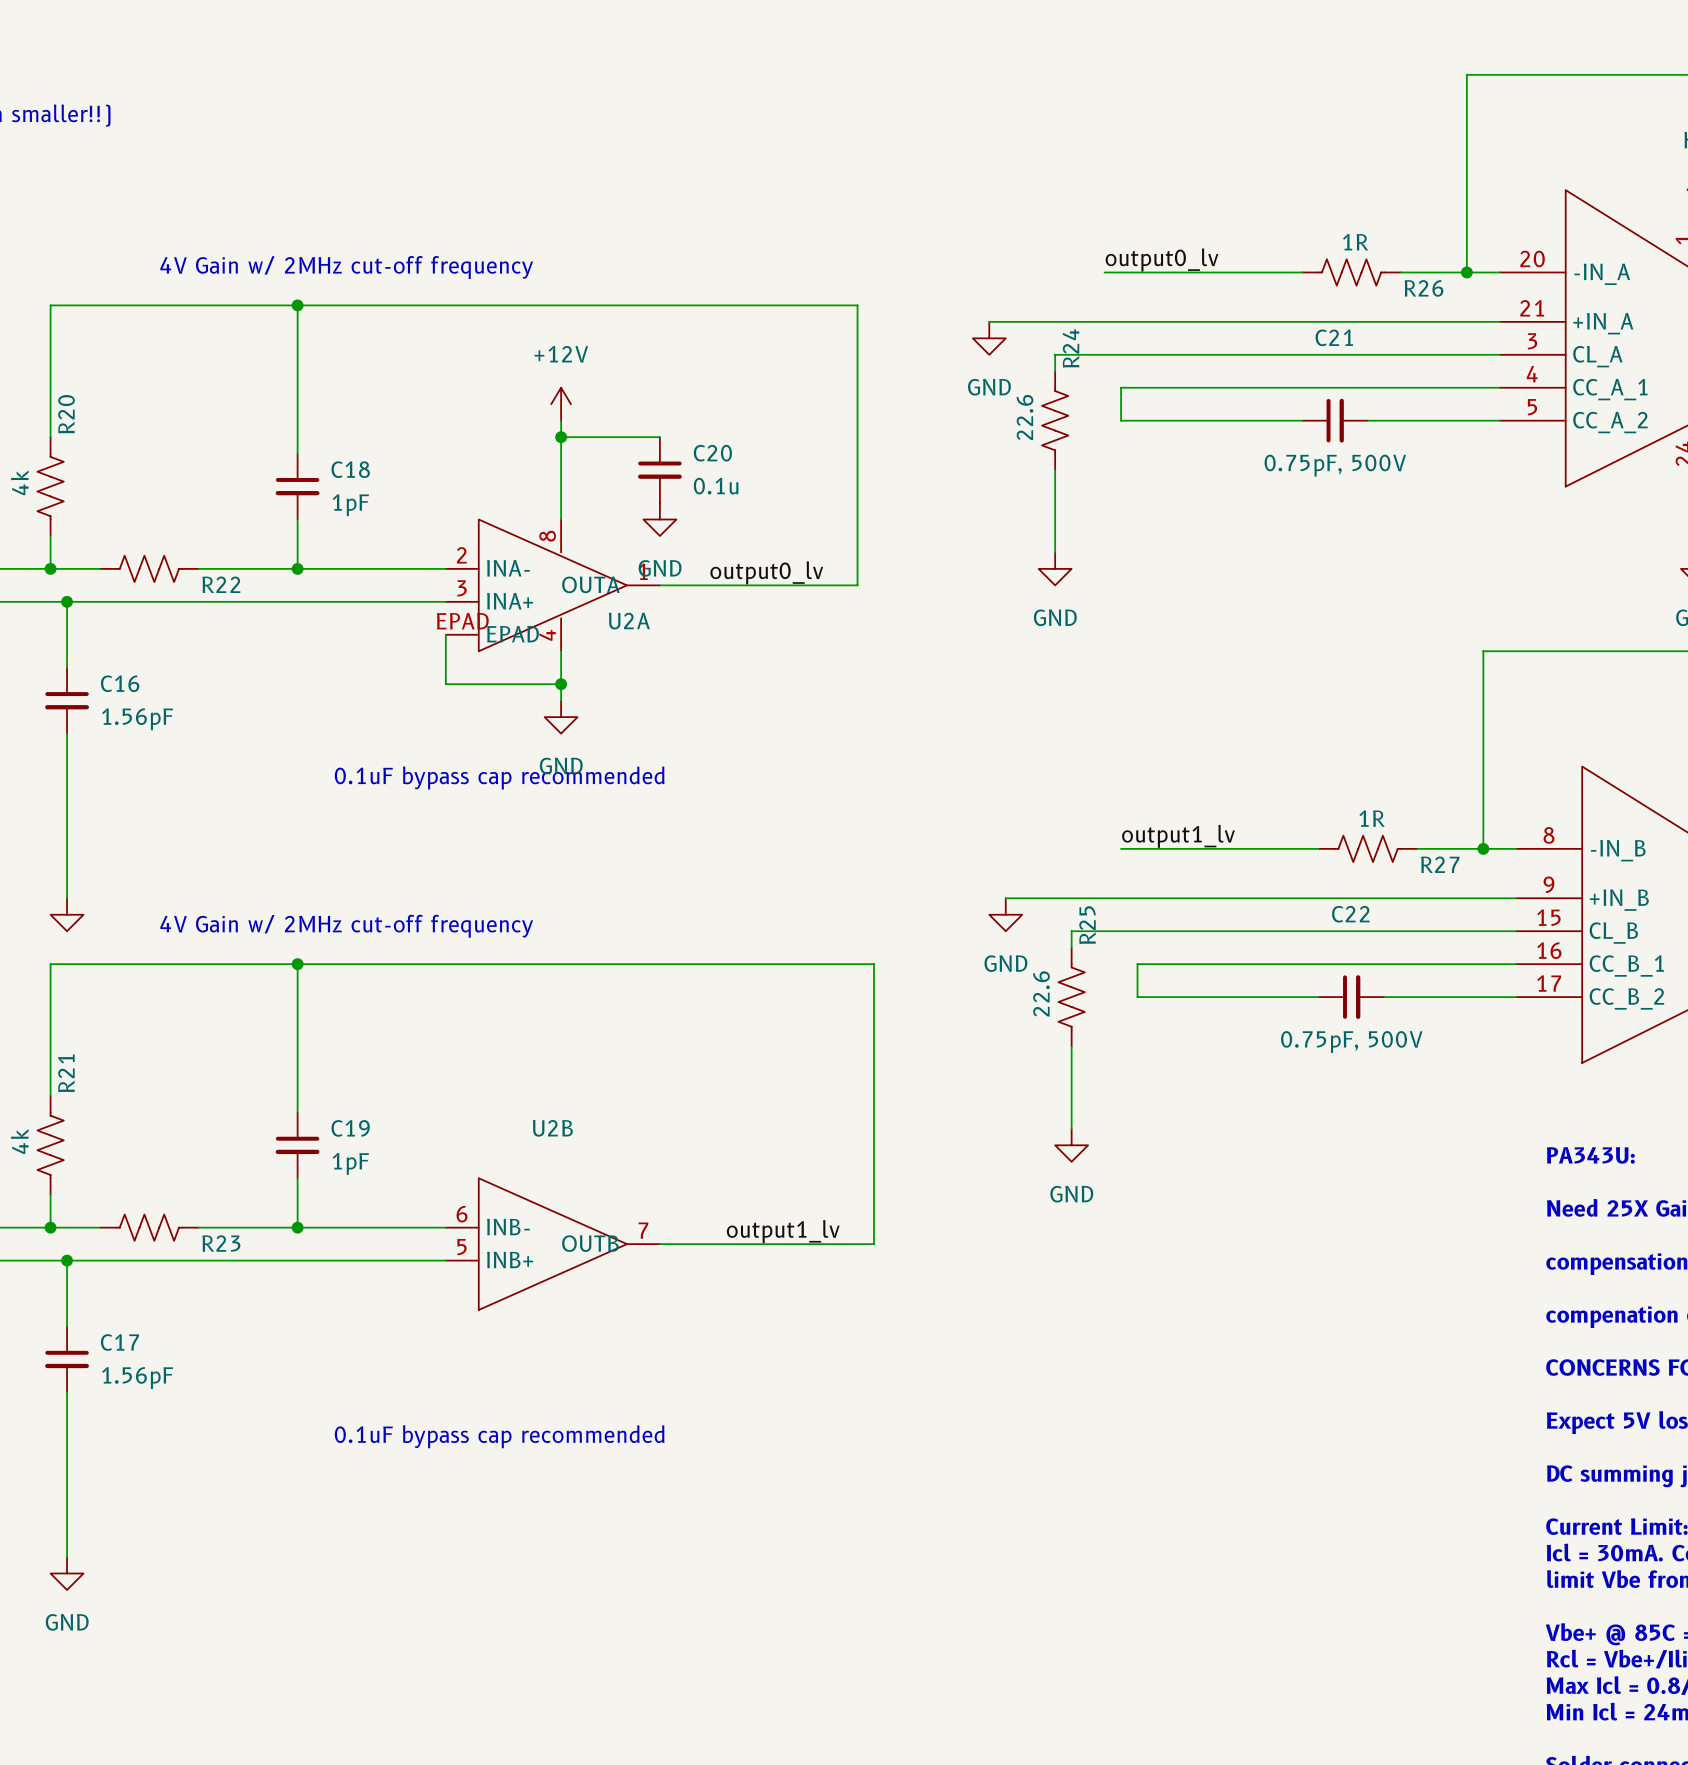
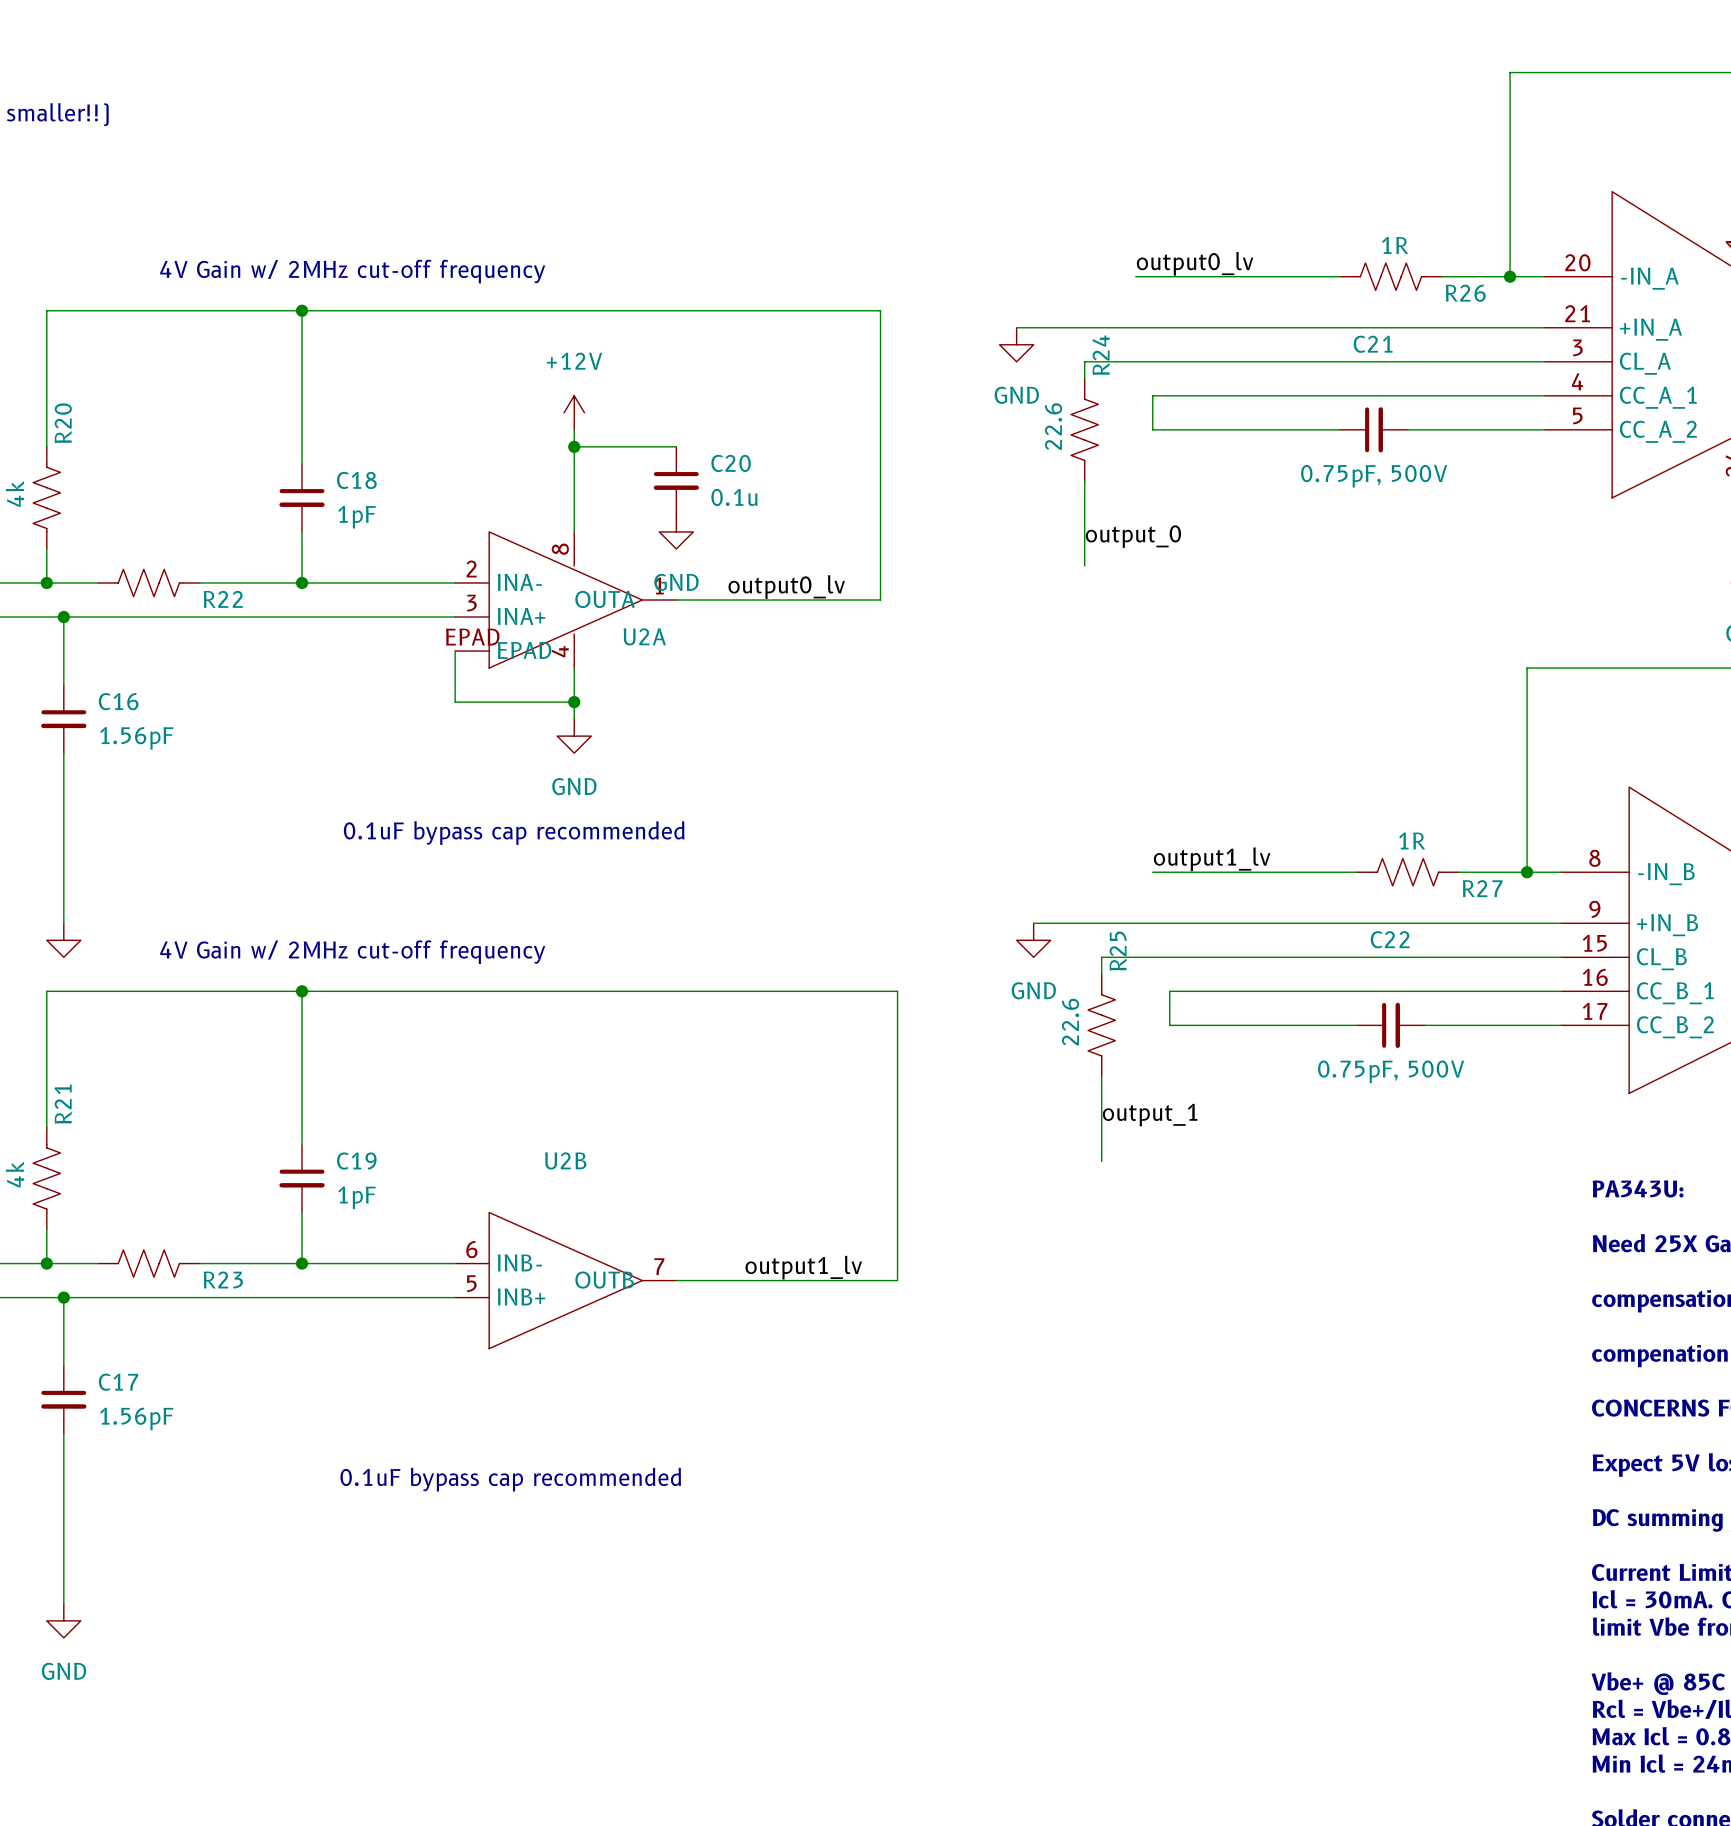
label: none -> output_0 (1133, 536)
power symbol: GND (1055, 568) -> none
text position: 0.1uF bypass cap recommended (499, 778) -> 0.1uF bypass cap recommended (514, 833)
label: none -> output_1 (1150, 1115)
power symbol: GND (1071, 1145) -> none

